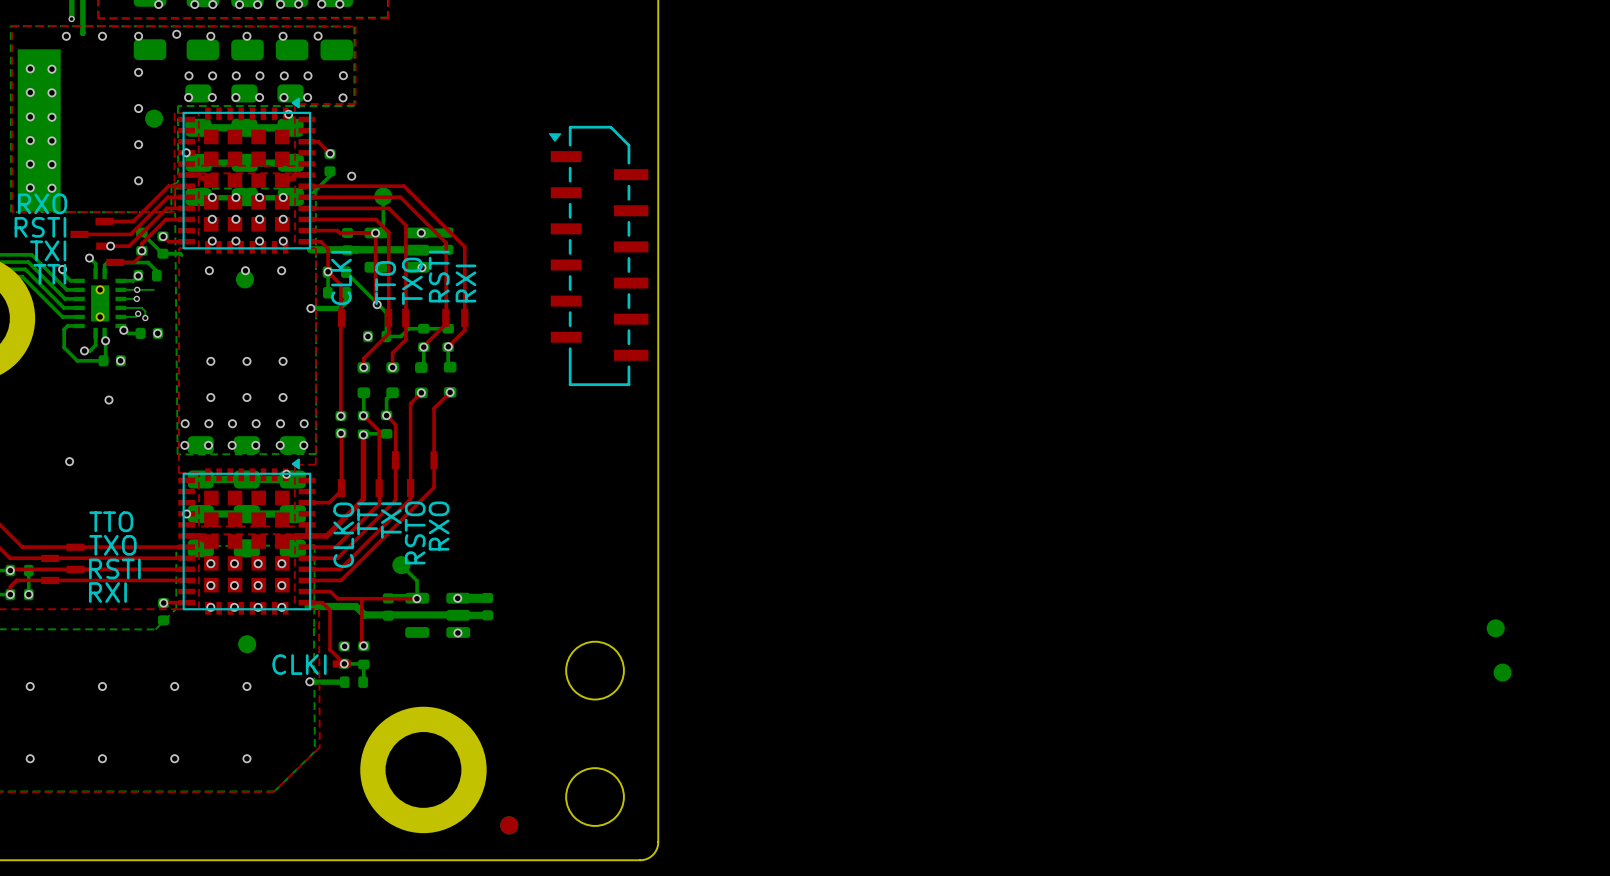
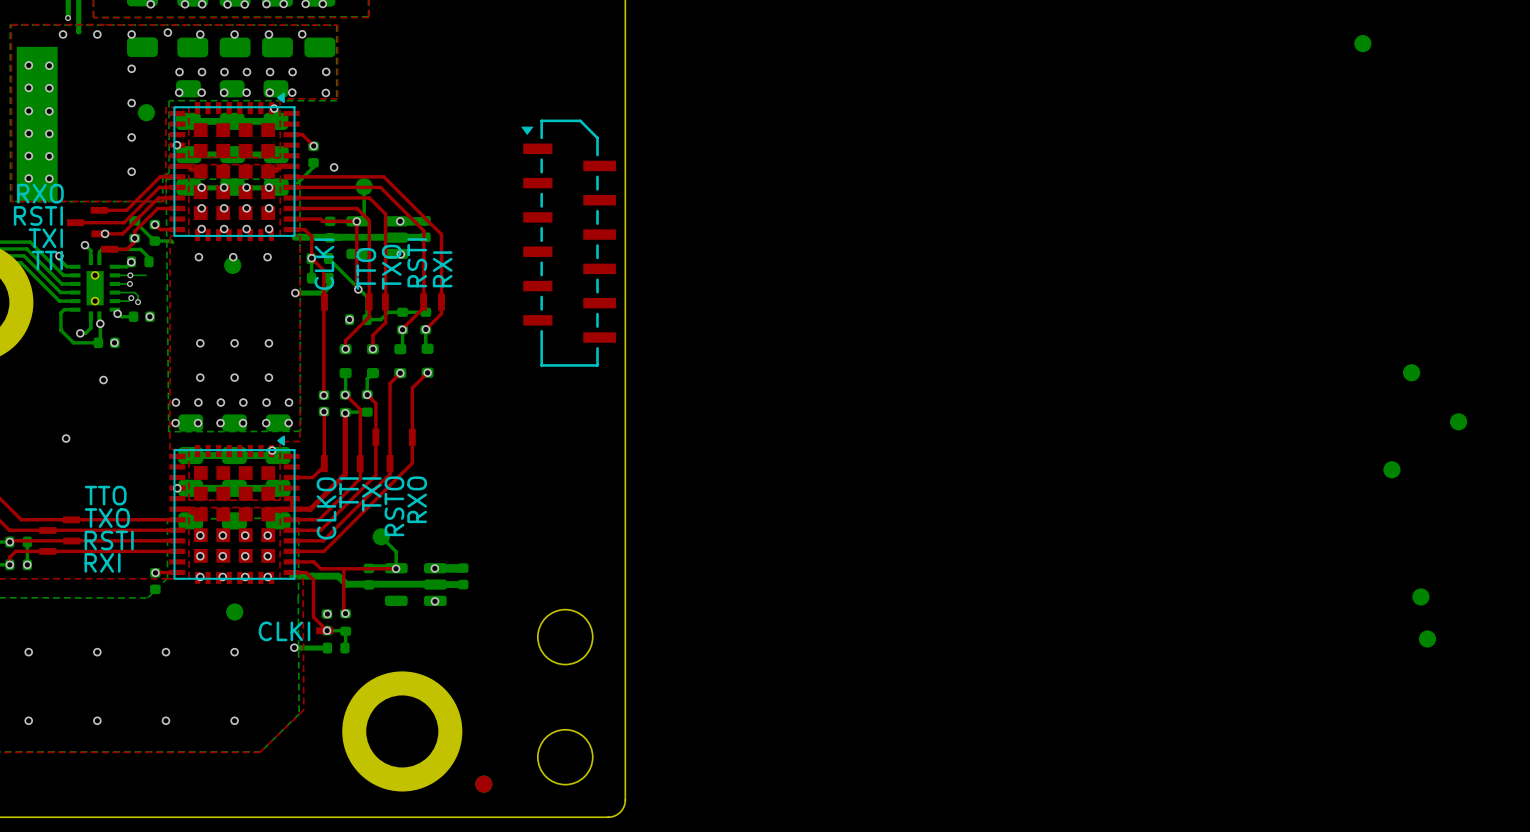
part: none -> (1362, 43)
part: none -> (1411, 372)
part: none -> (1458, 421)
part: none -> (1391, 469)

